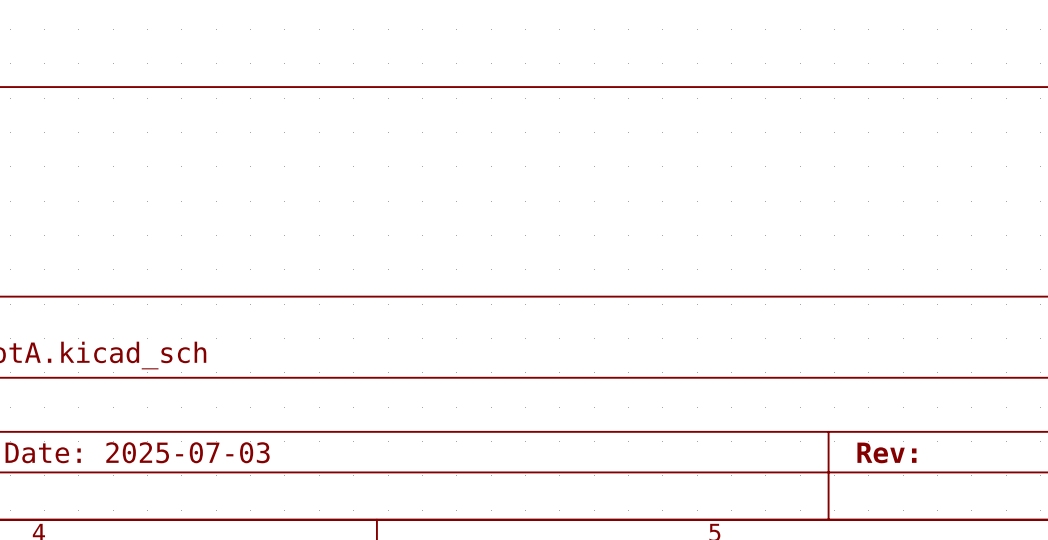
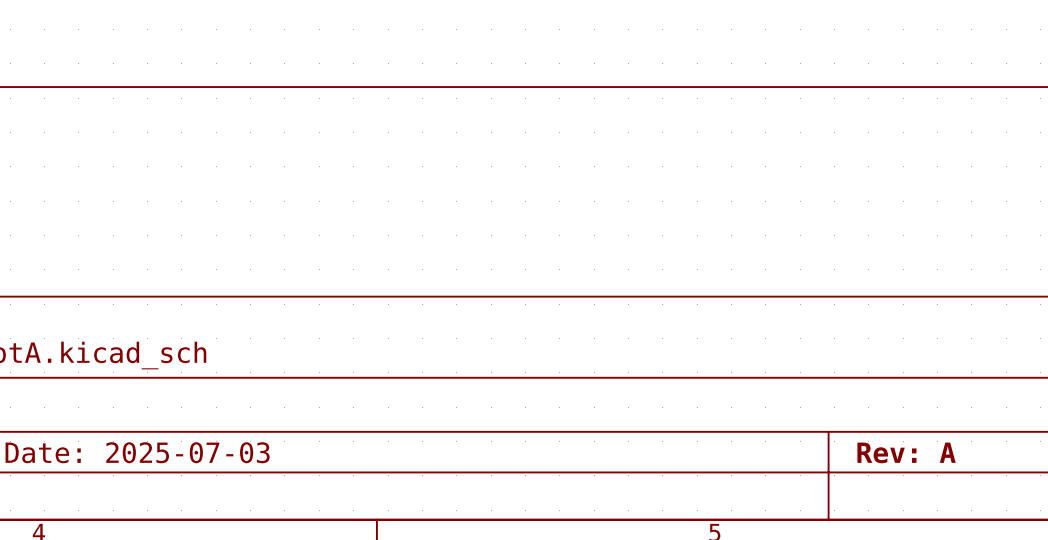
title block: Rev: (886, 452) -> Rev: A (906, 452)

